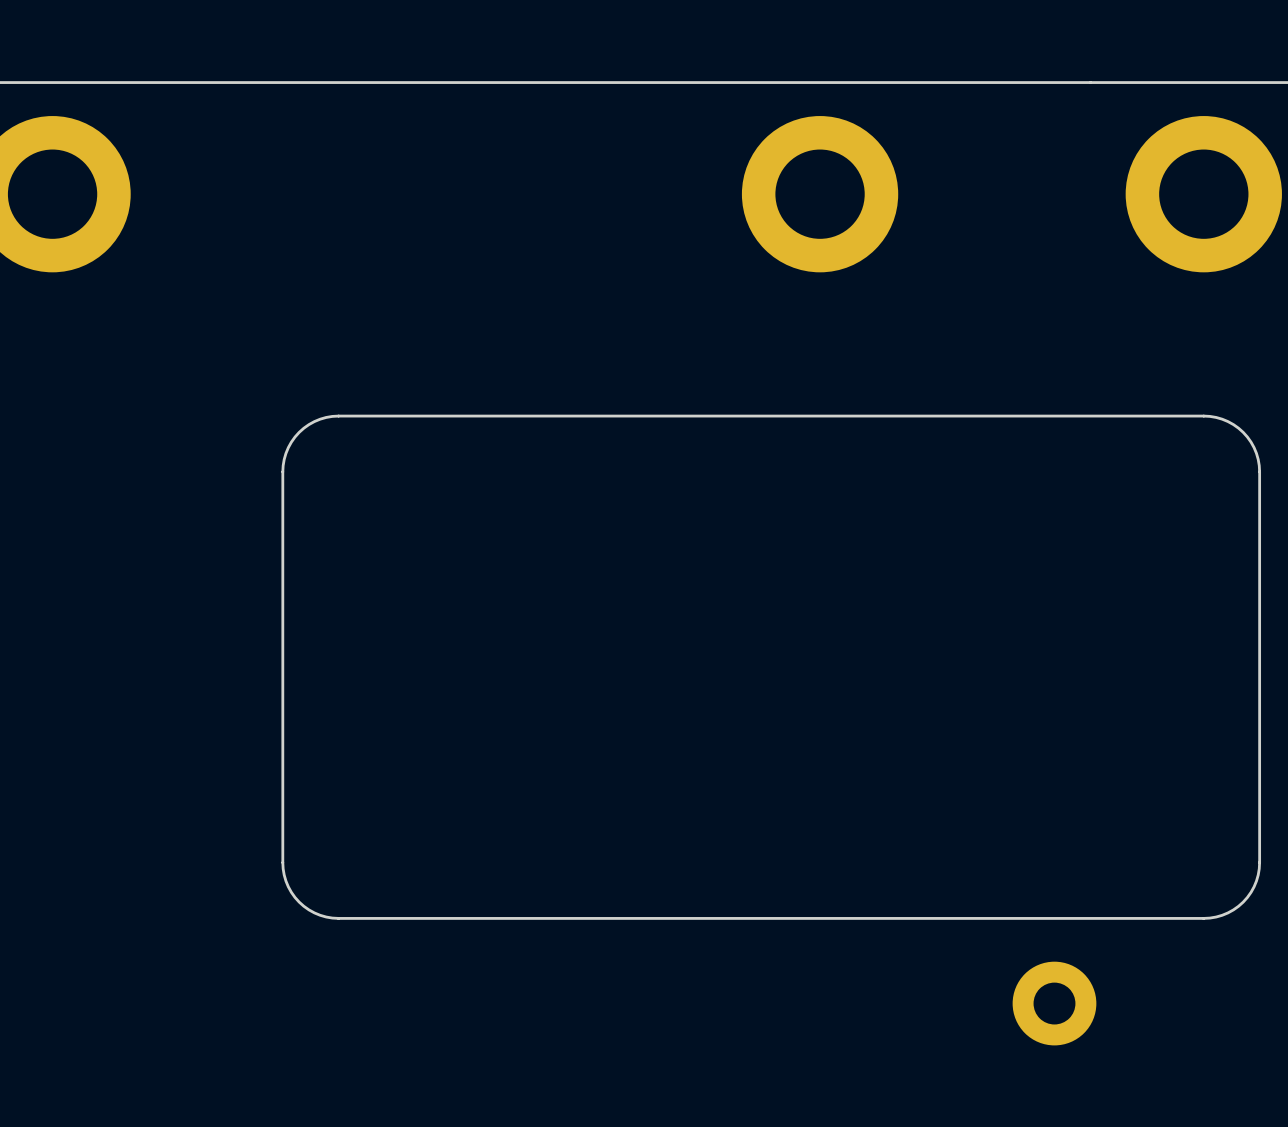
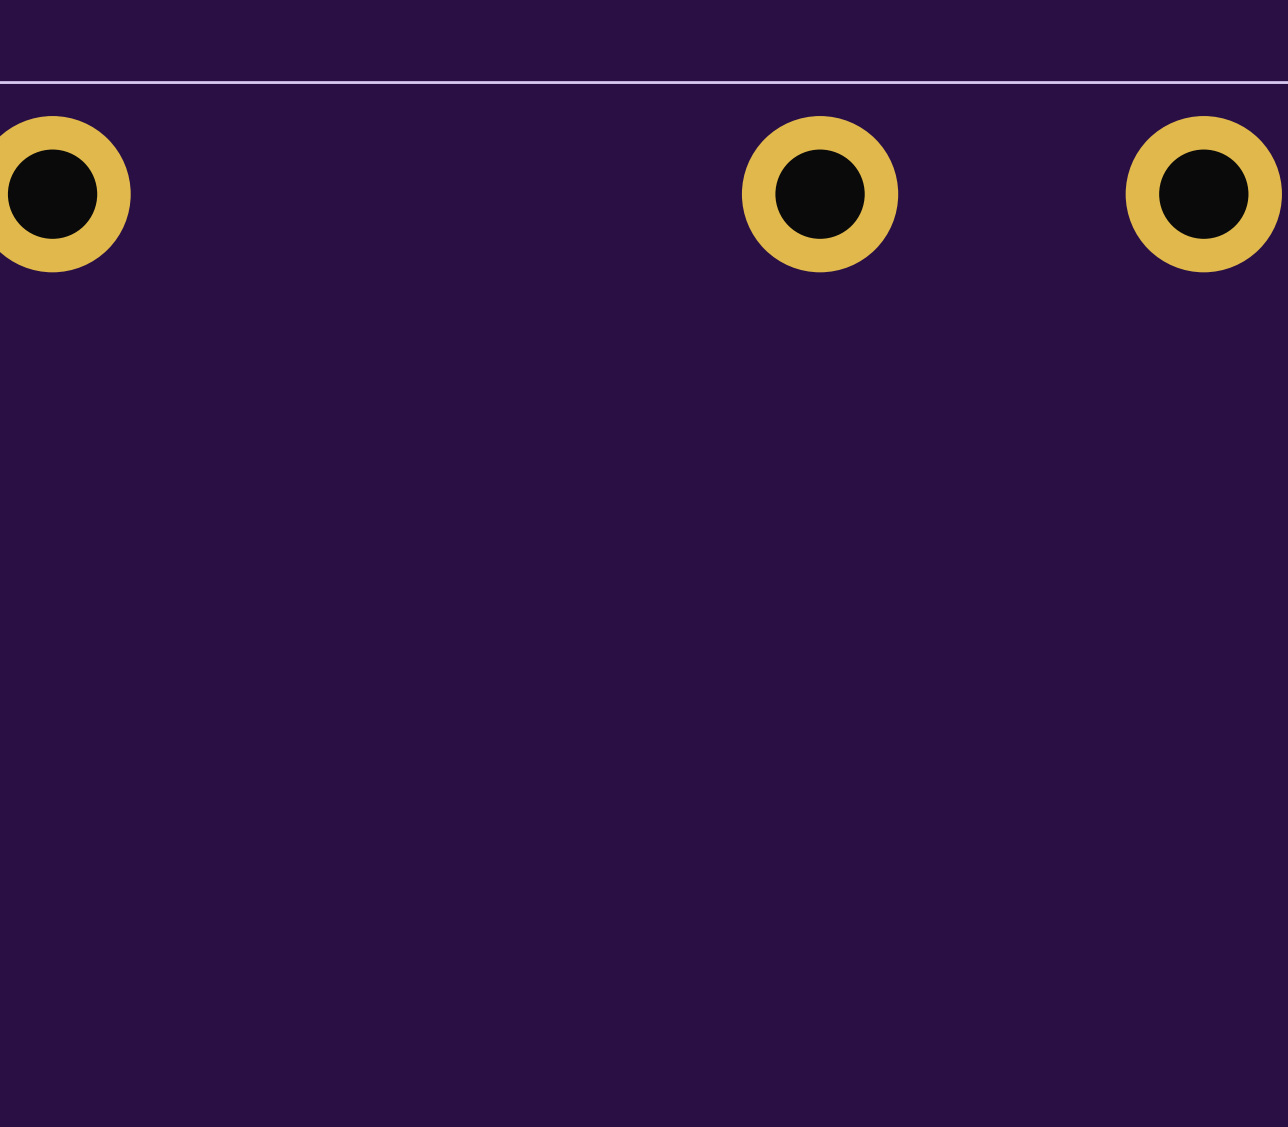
board edge: (1203, 416) (338, 416) (314, 421) (299, 432) (291, 442) (284, 459) (282, 471) (282, 862) (288, 886) (299, 902) (308, 909) (320, 915) (338, 918) (1203, 918) (1228, 912) (1238, 906) (1251, 892) (1259, 868) (1259, 471) (1256, 453) (1243, 432) (1228, 421) (1203, 416) -> none
part: (1054, 1003) -> none

